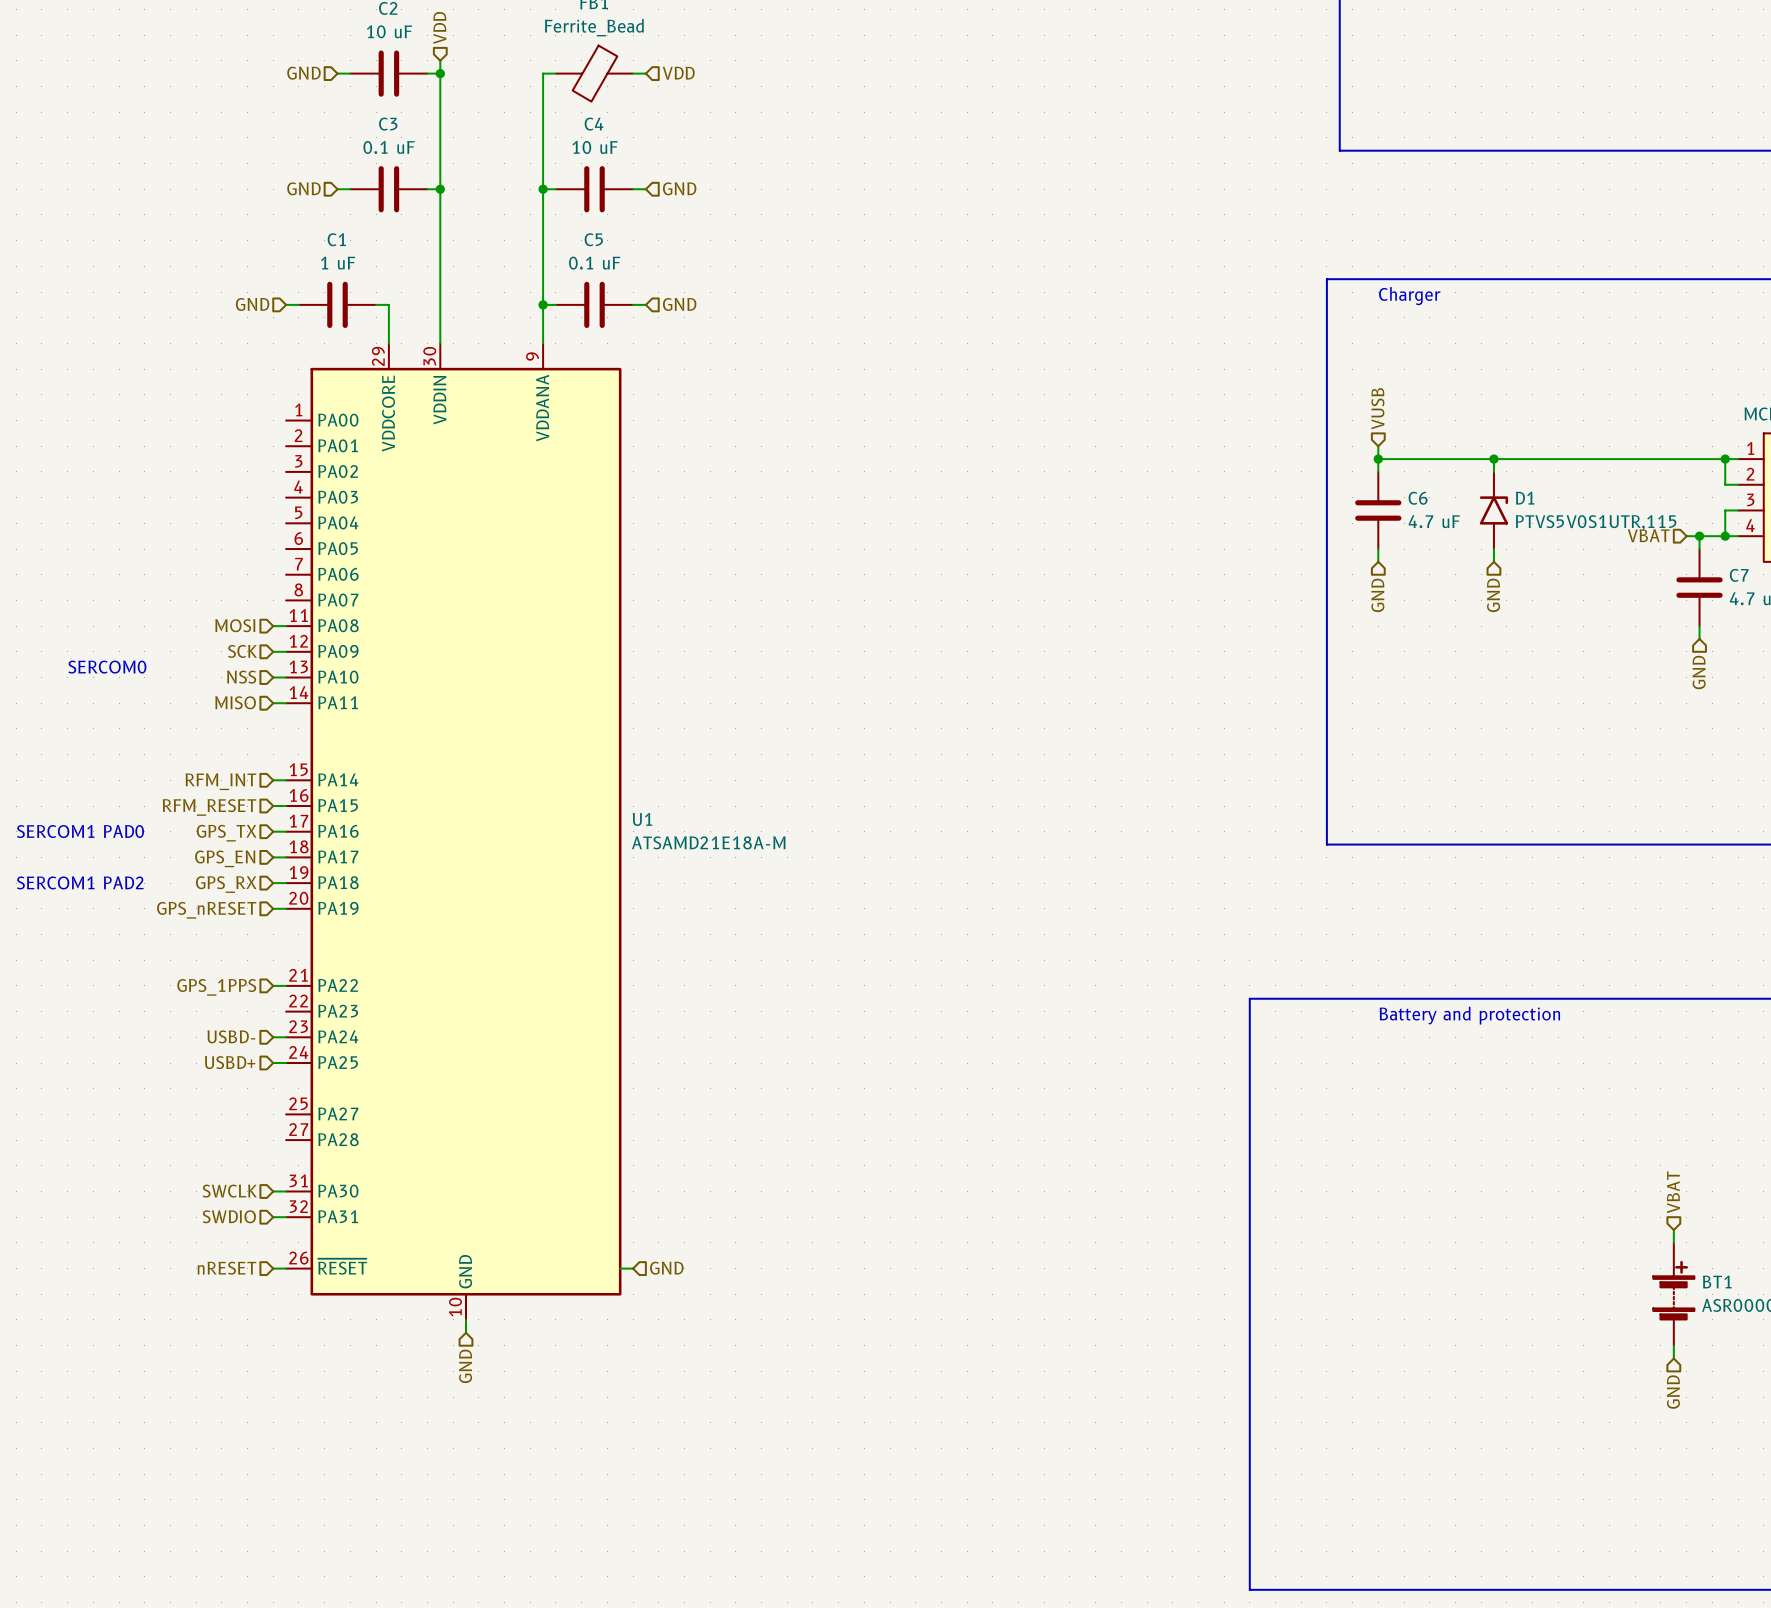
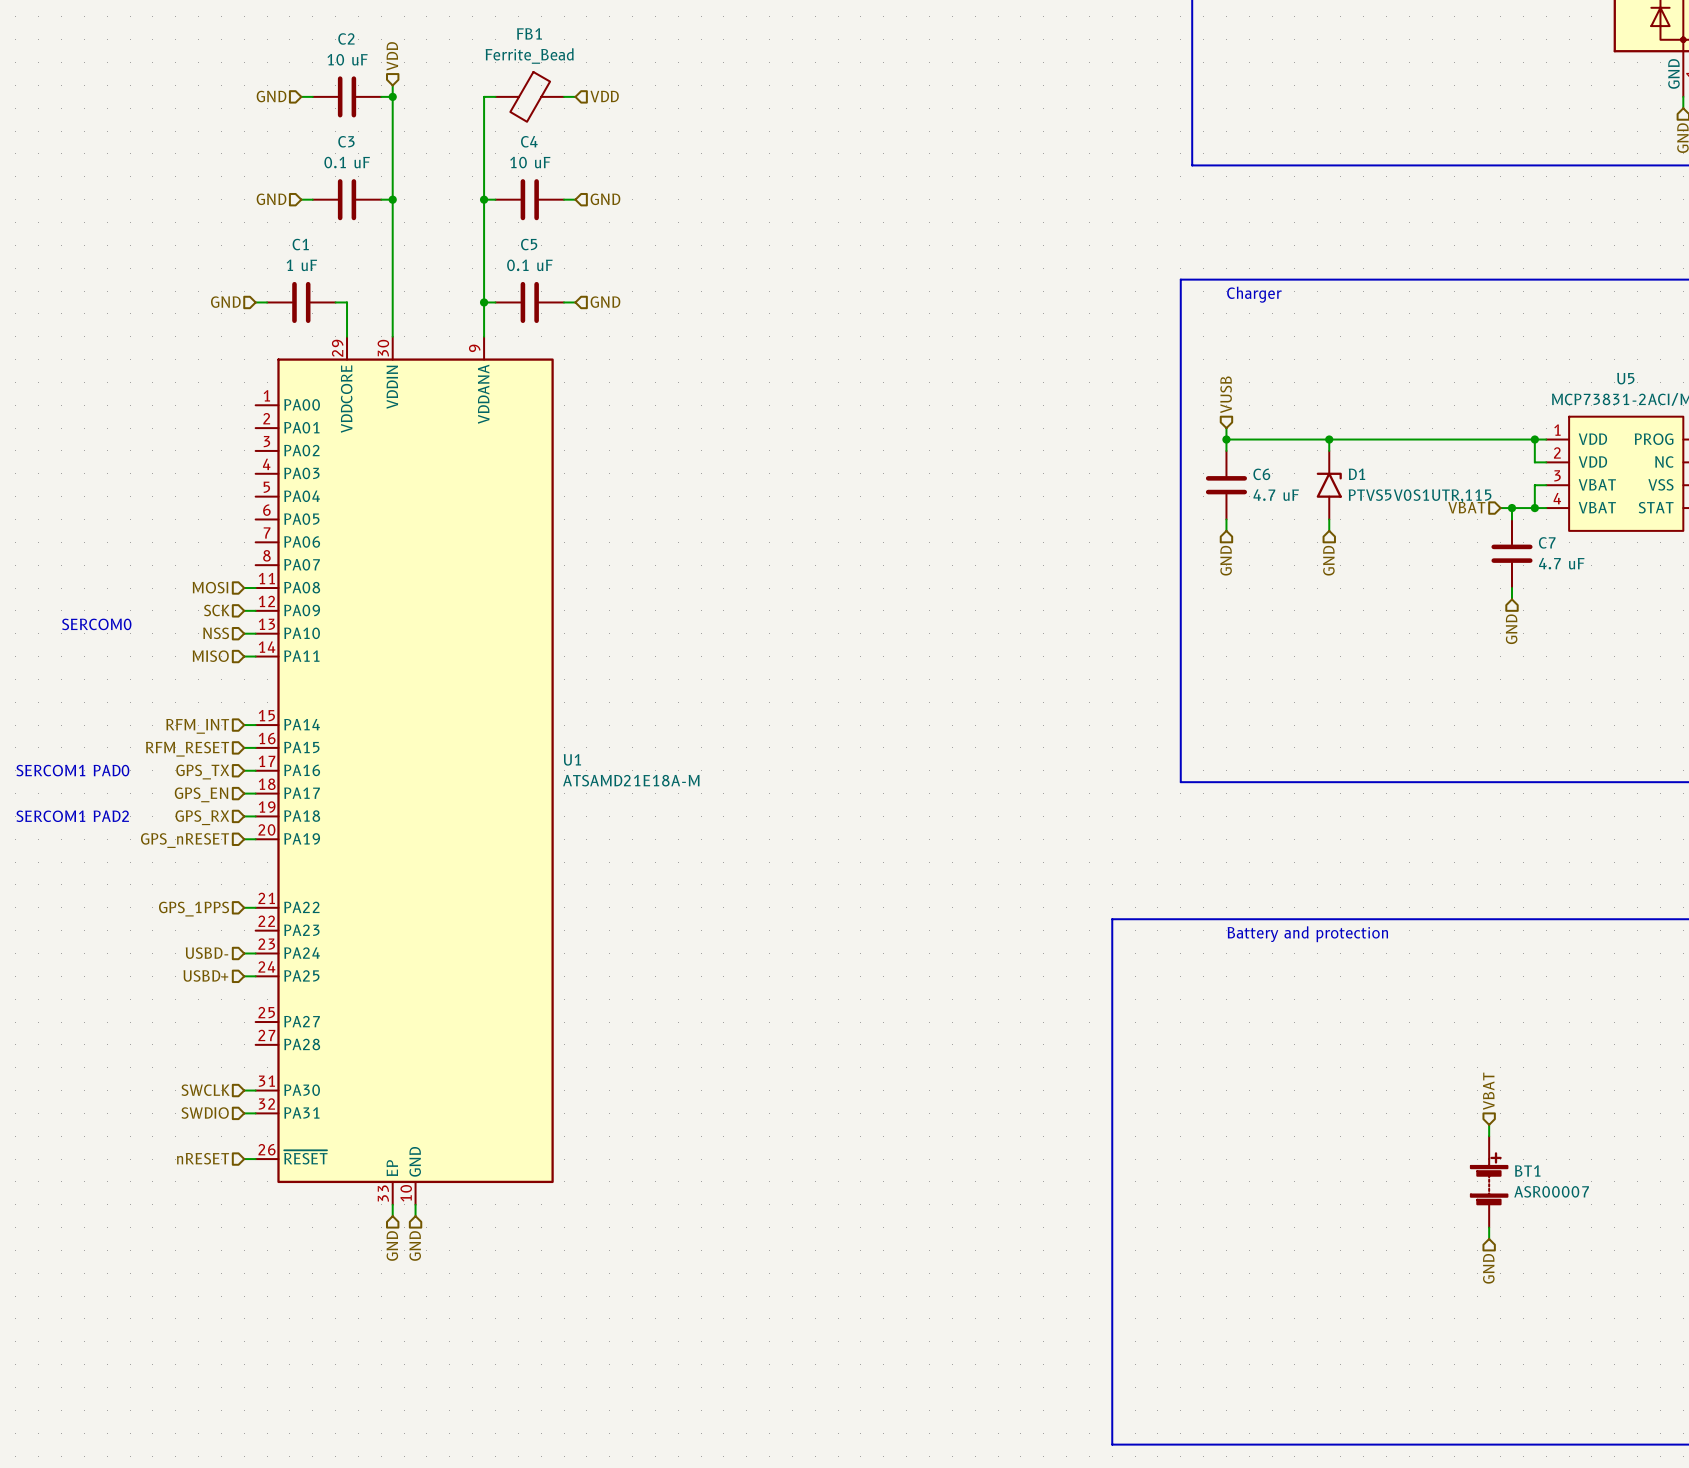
U1 symbol: [286, 343, 622, 1320] -> [255, 336, 554, 1205]
wire: (620, 1268) (633, 1268) -> none
hierarchical label rotation: 0° (666, 1268) -> 90° clockwise (392, 1245)
hierarchical label position: GND (666, 1268) -> GND (392, 1245)
wire: none -> (392, 1204) (392, 1216)

